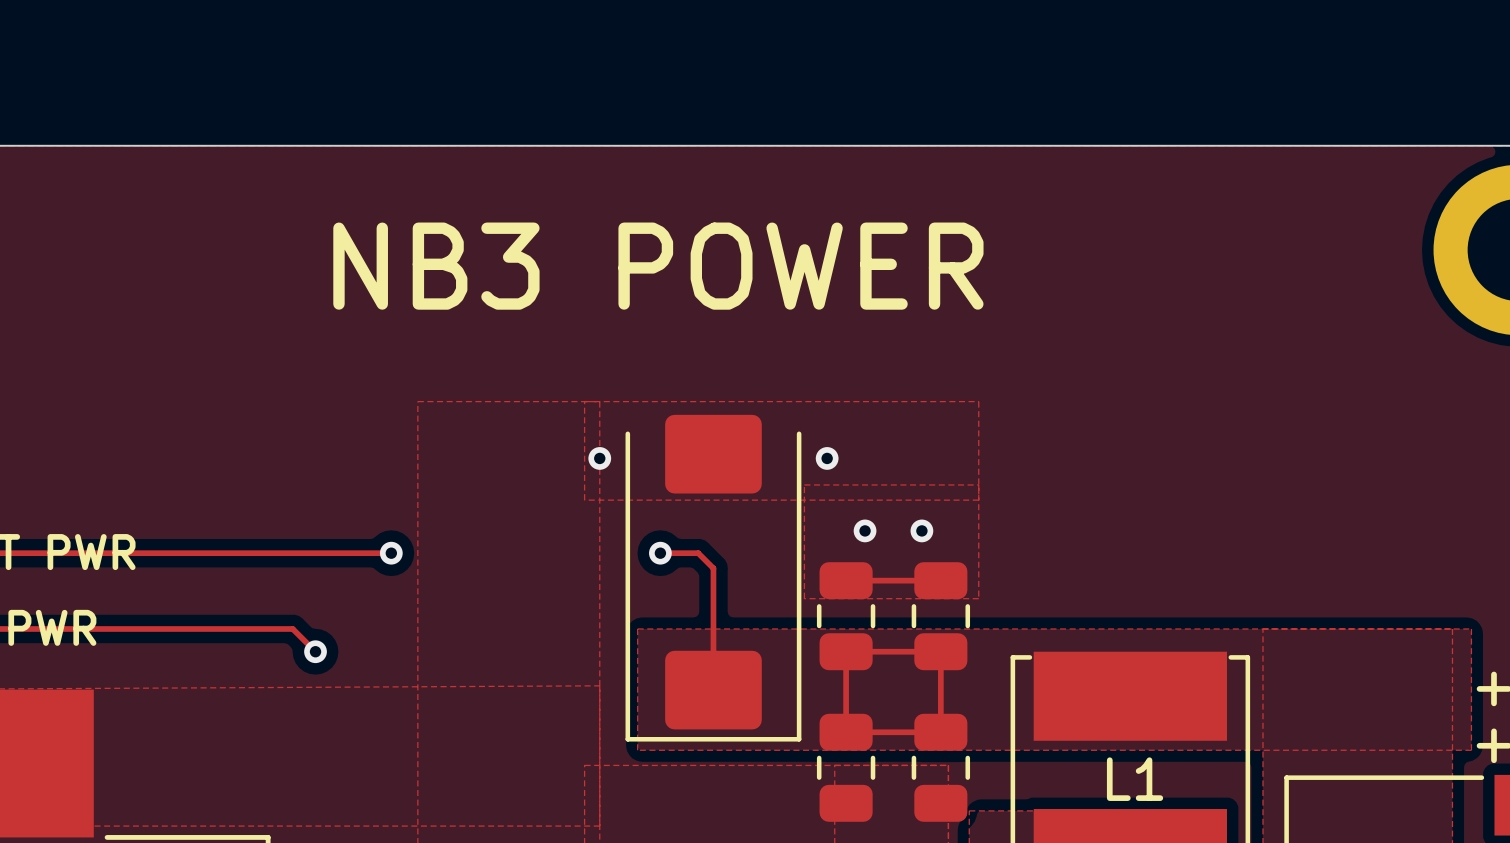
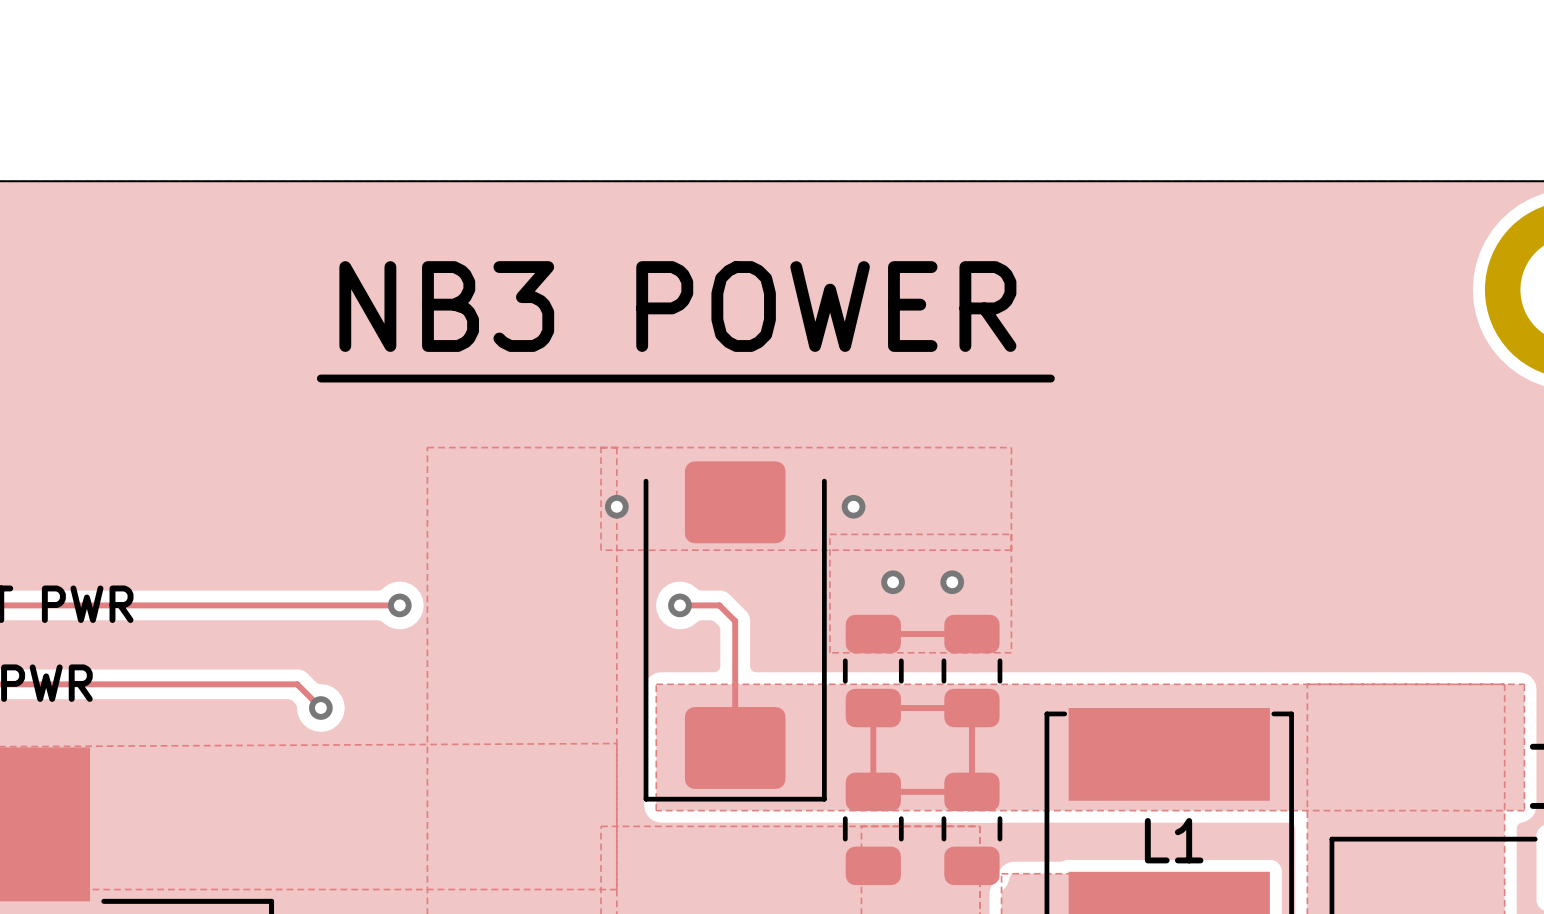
line: none -> (320, 378) (1050, 378)

